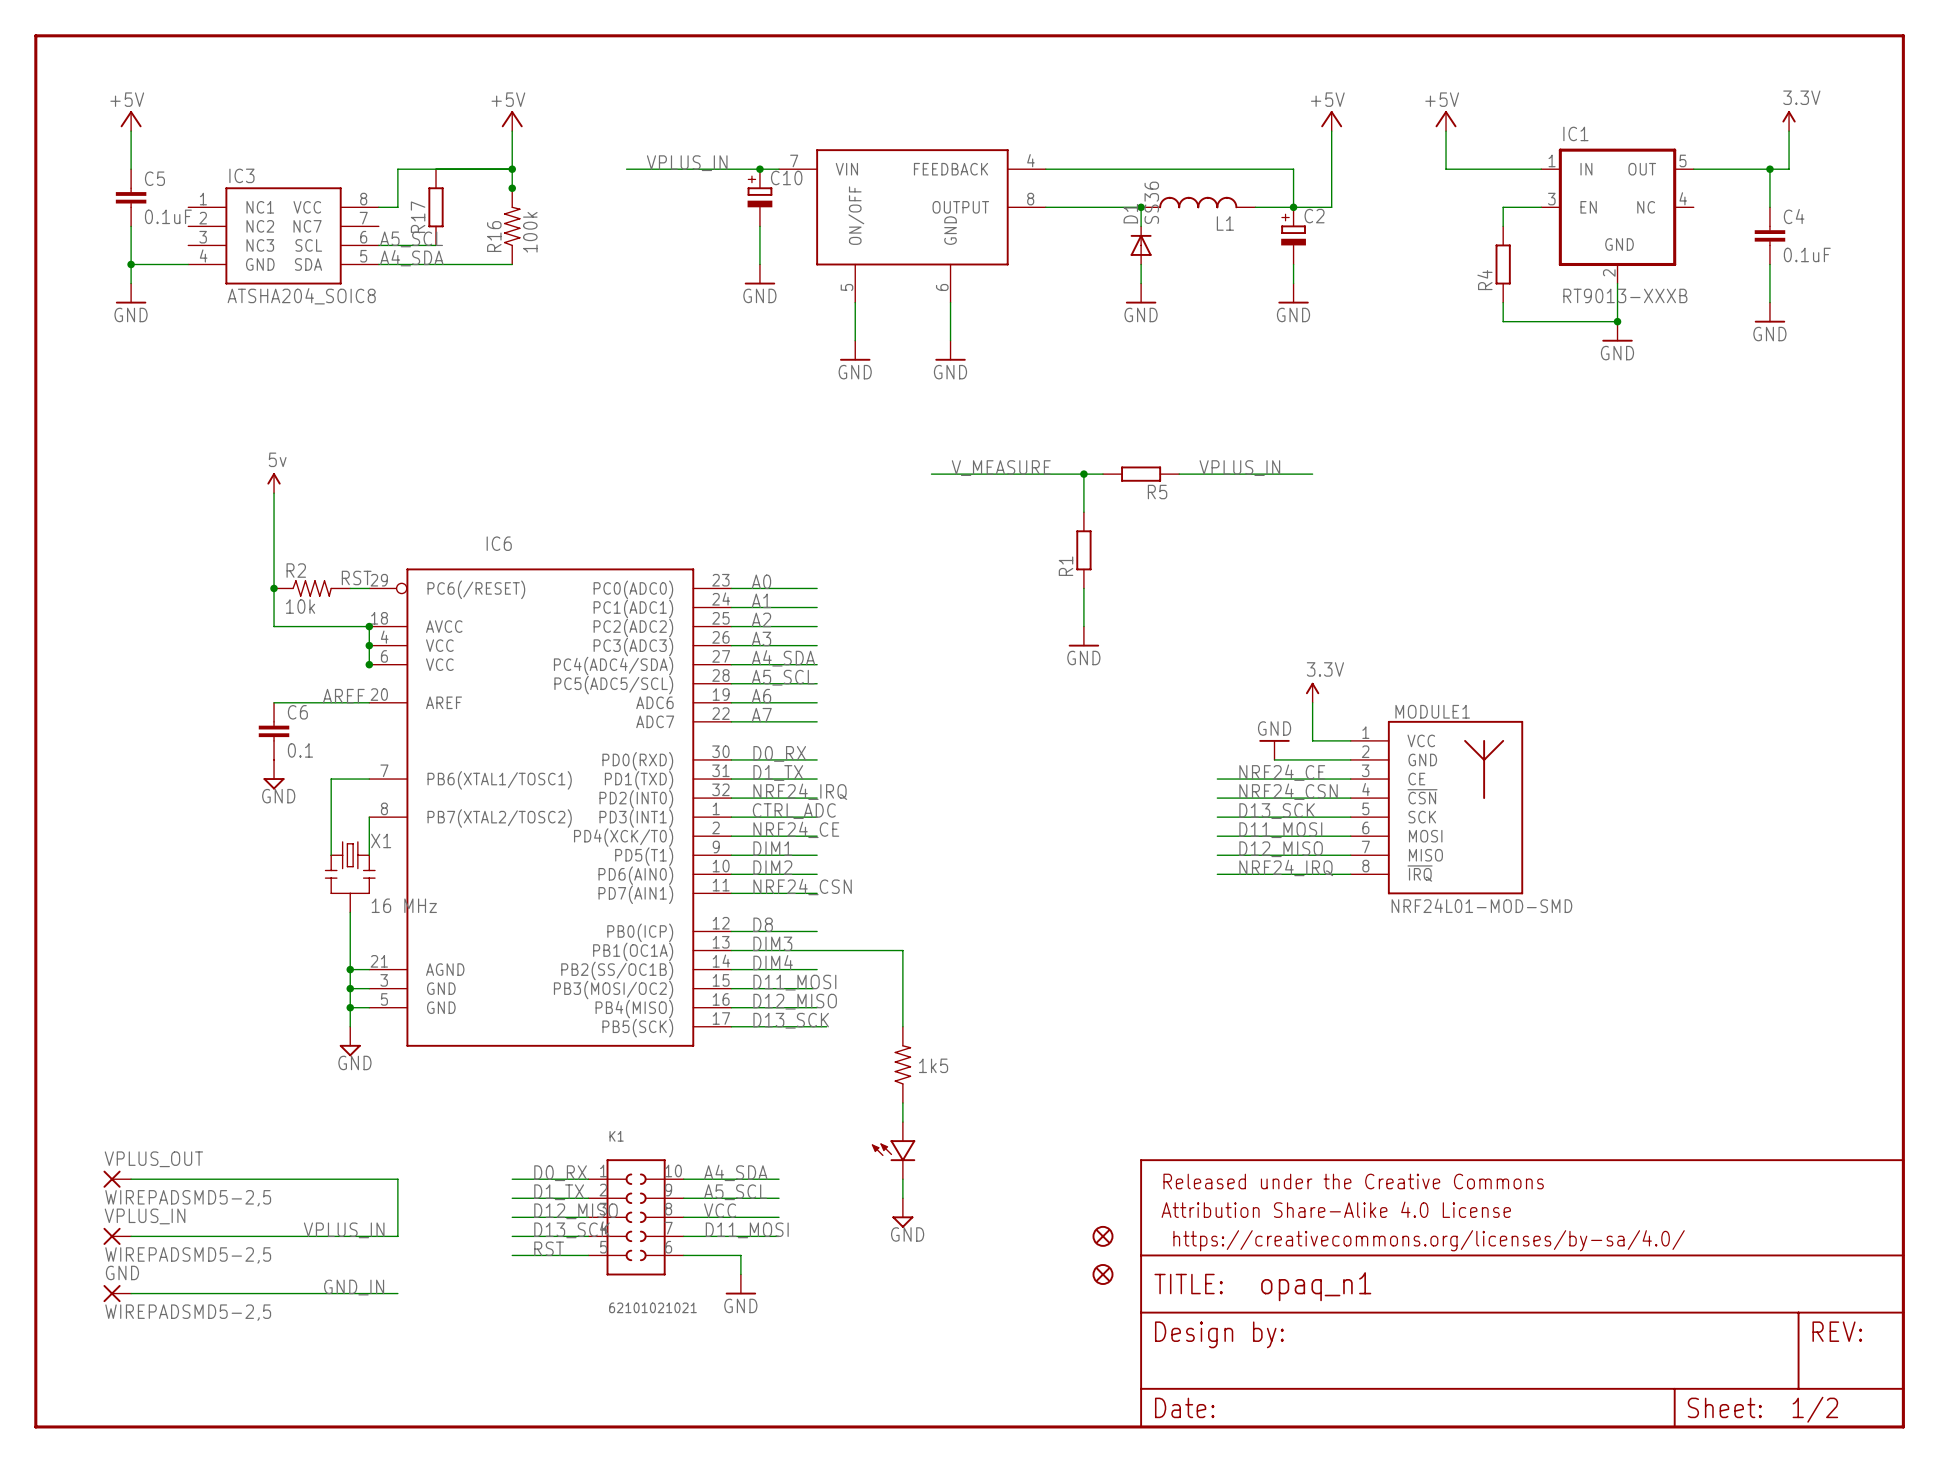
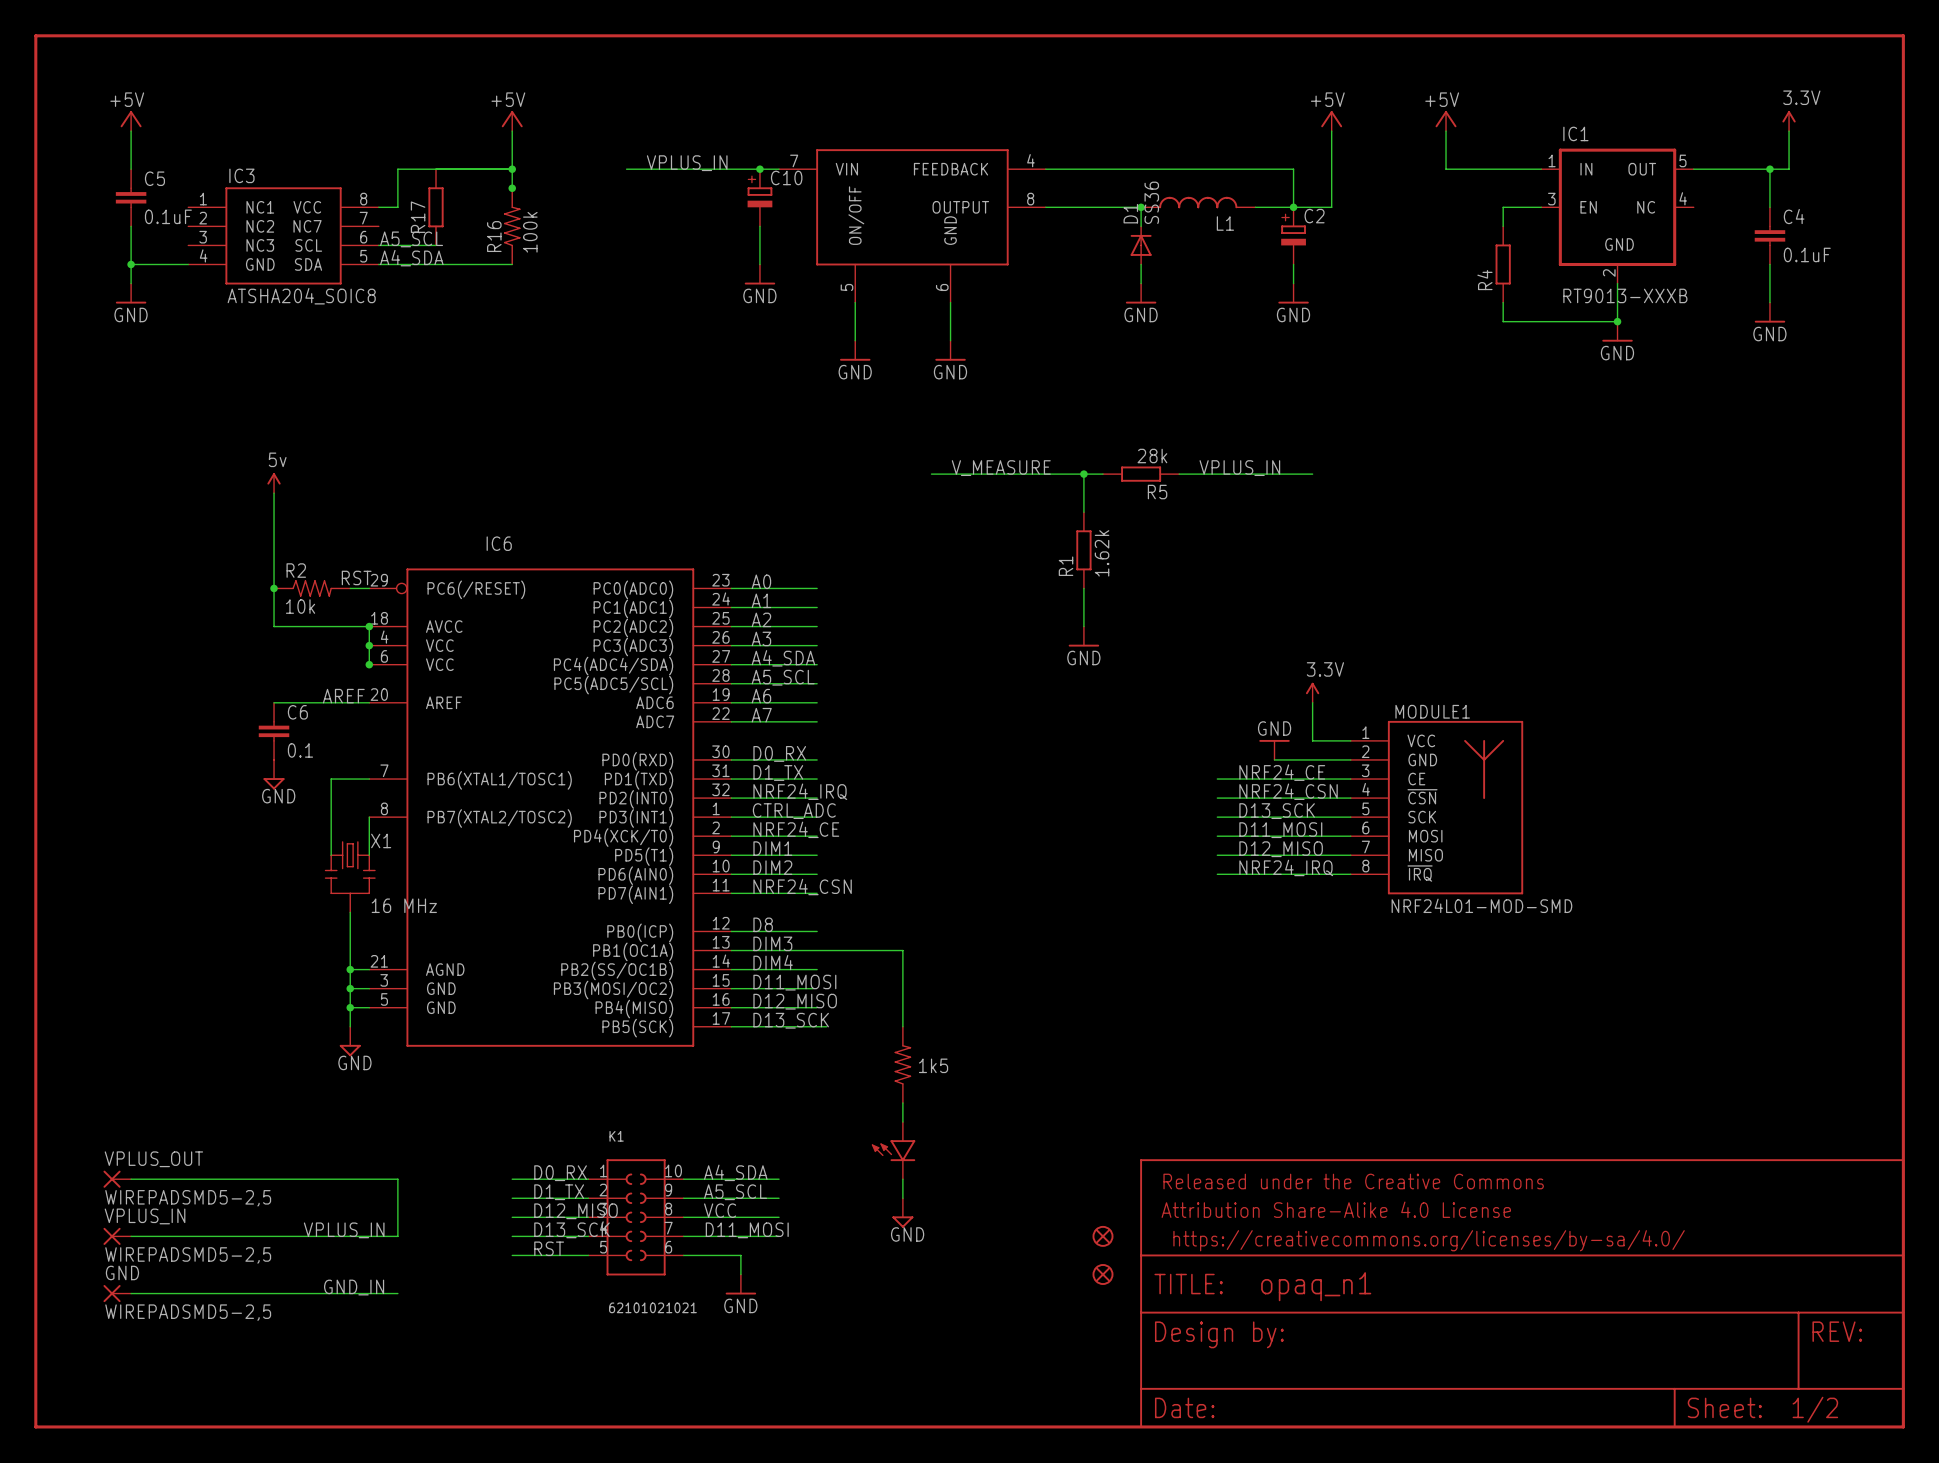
R5 value: none -> 28k (1152, 456)
R1 value: none -> 1.62k (1102, 553)

